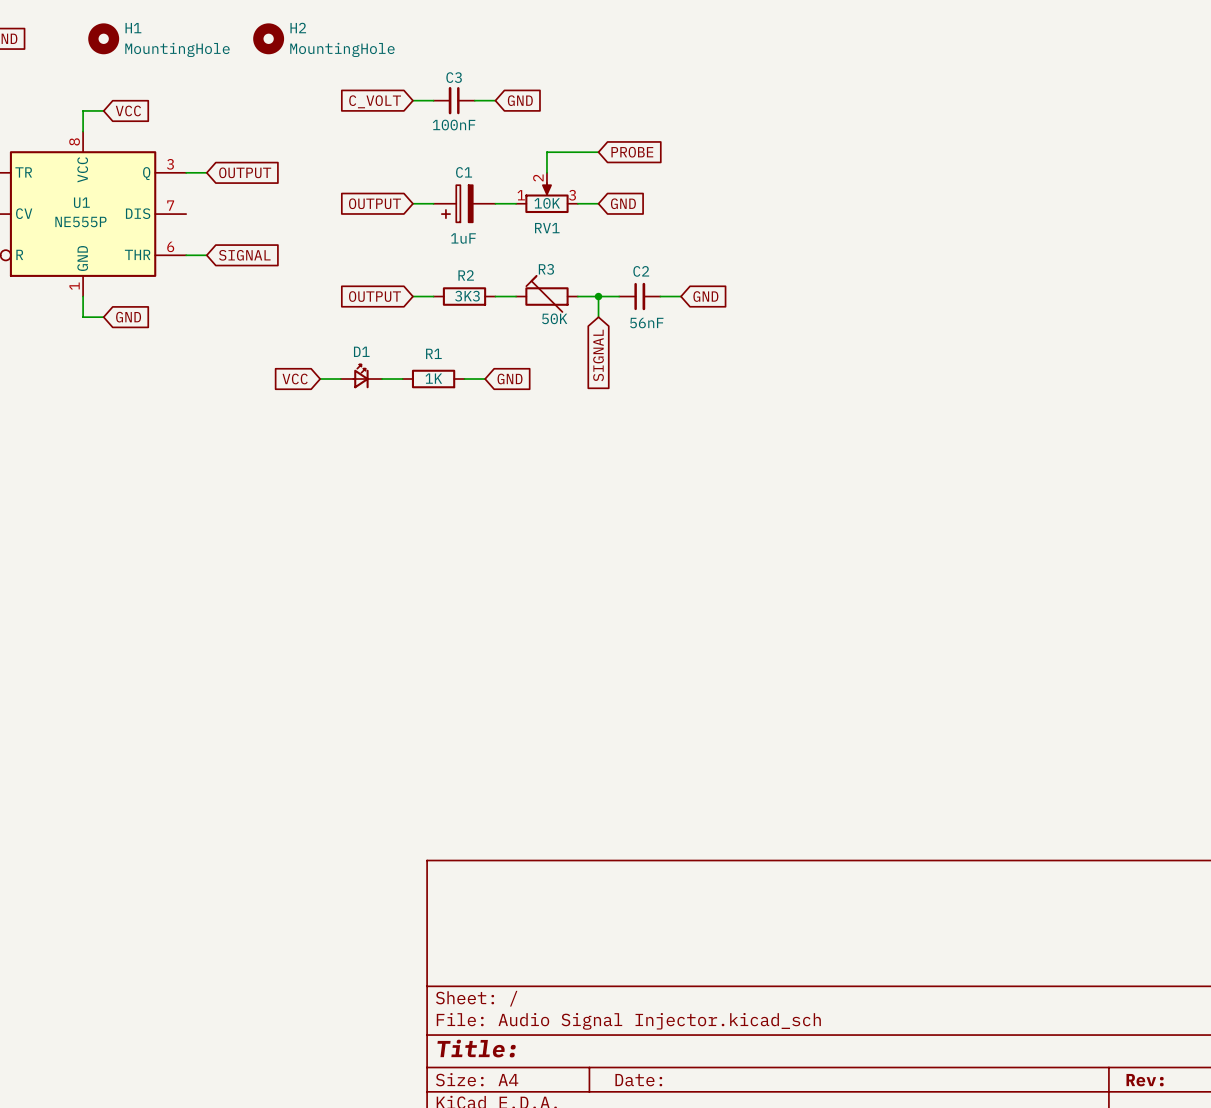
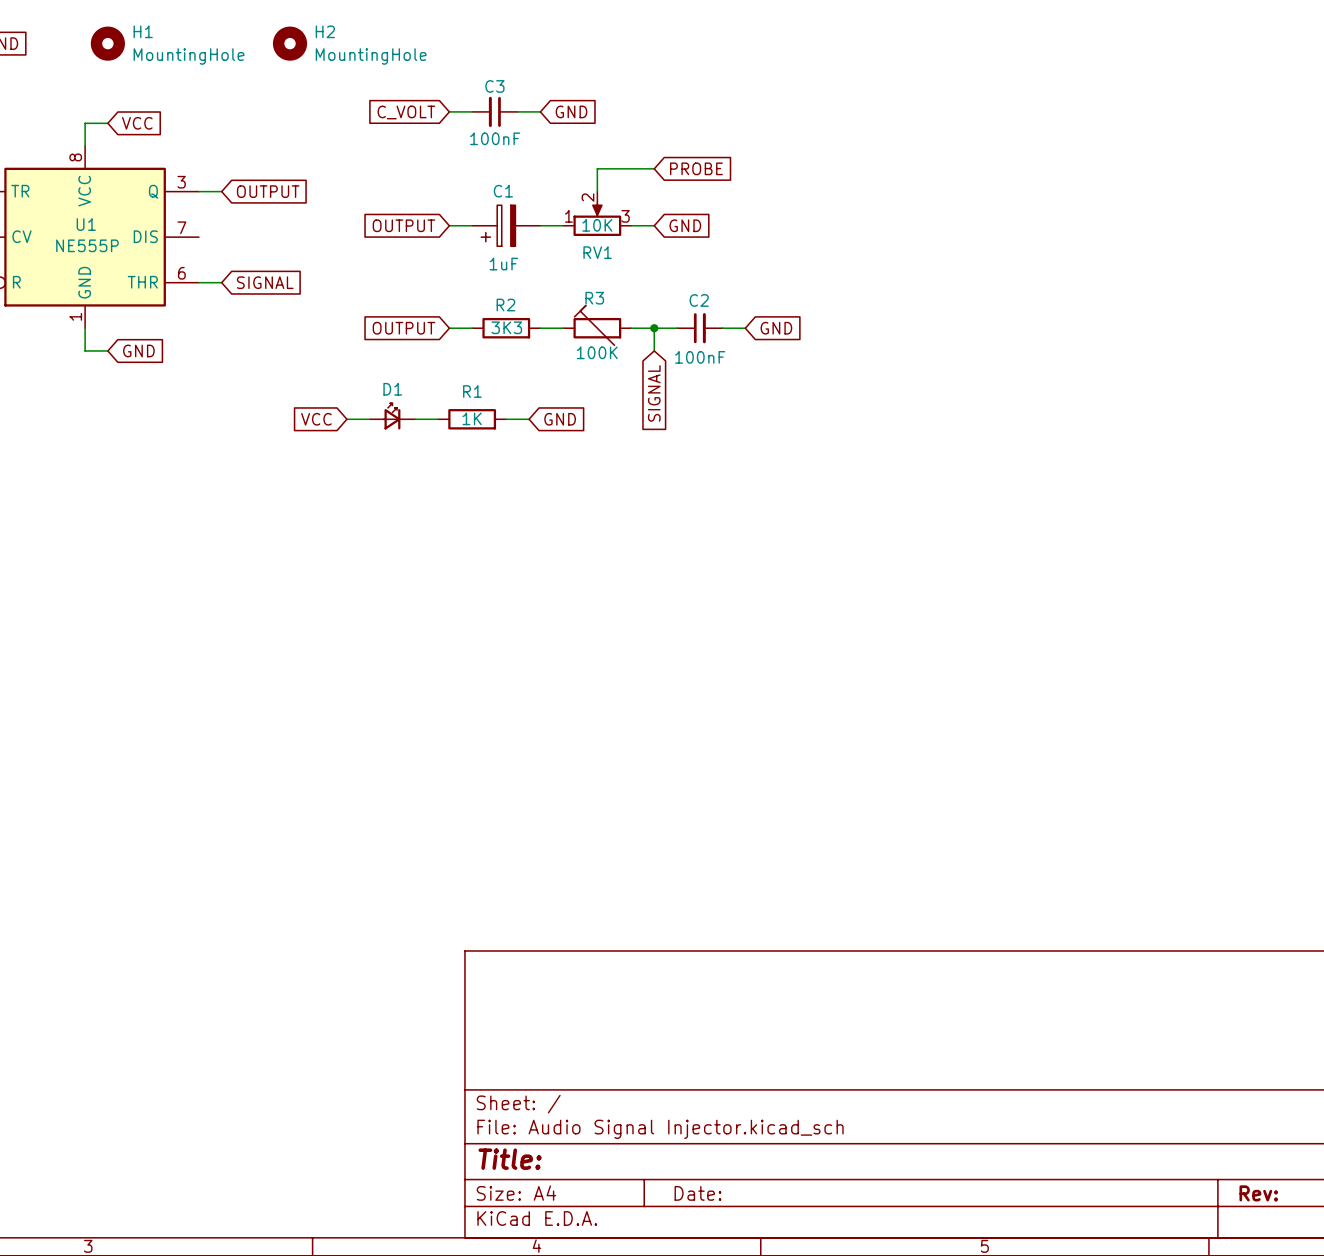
R3 value: 50K (554, 318) -> 100K (597, 352)
C2 value: 56nF (646, 323) -> 100nF (700, 357)

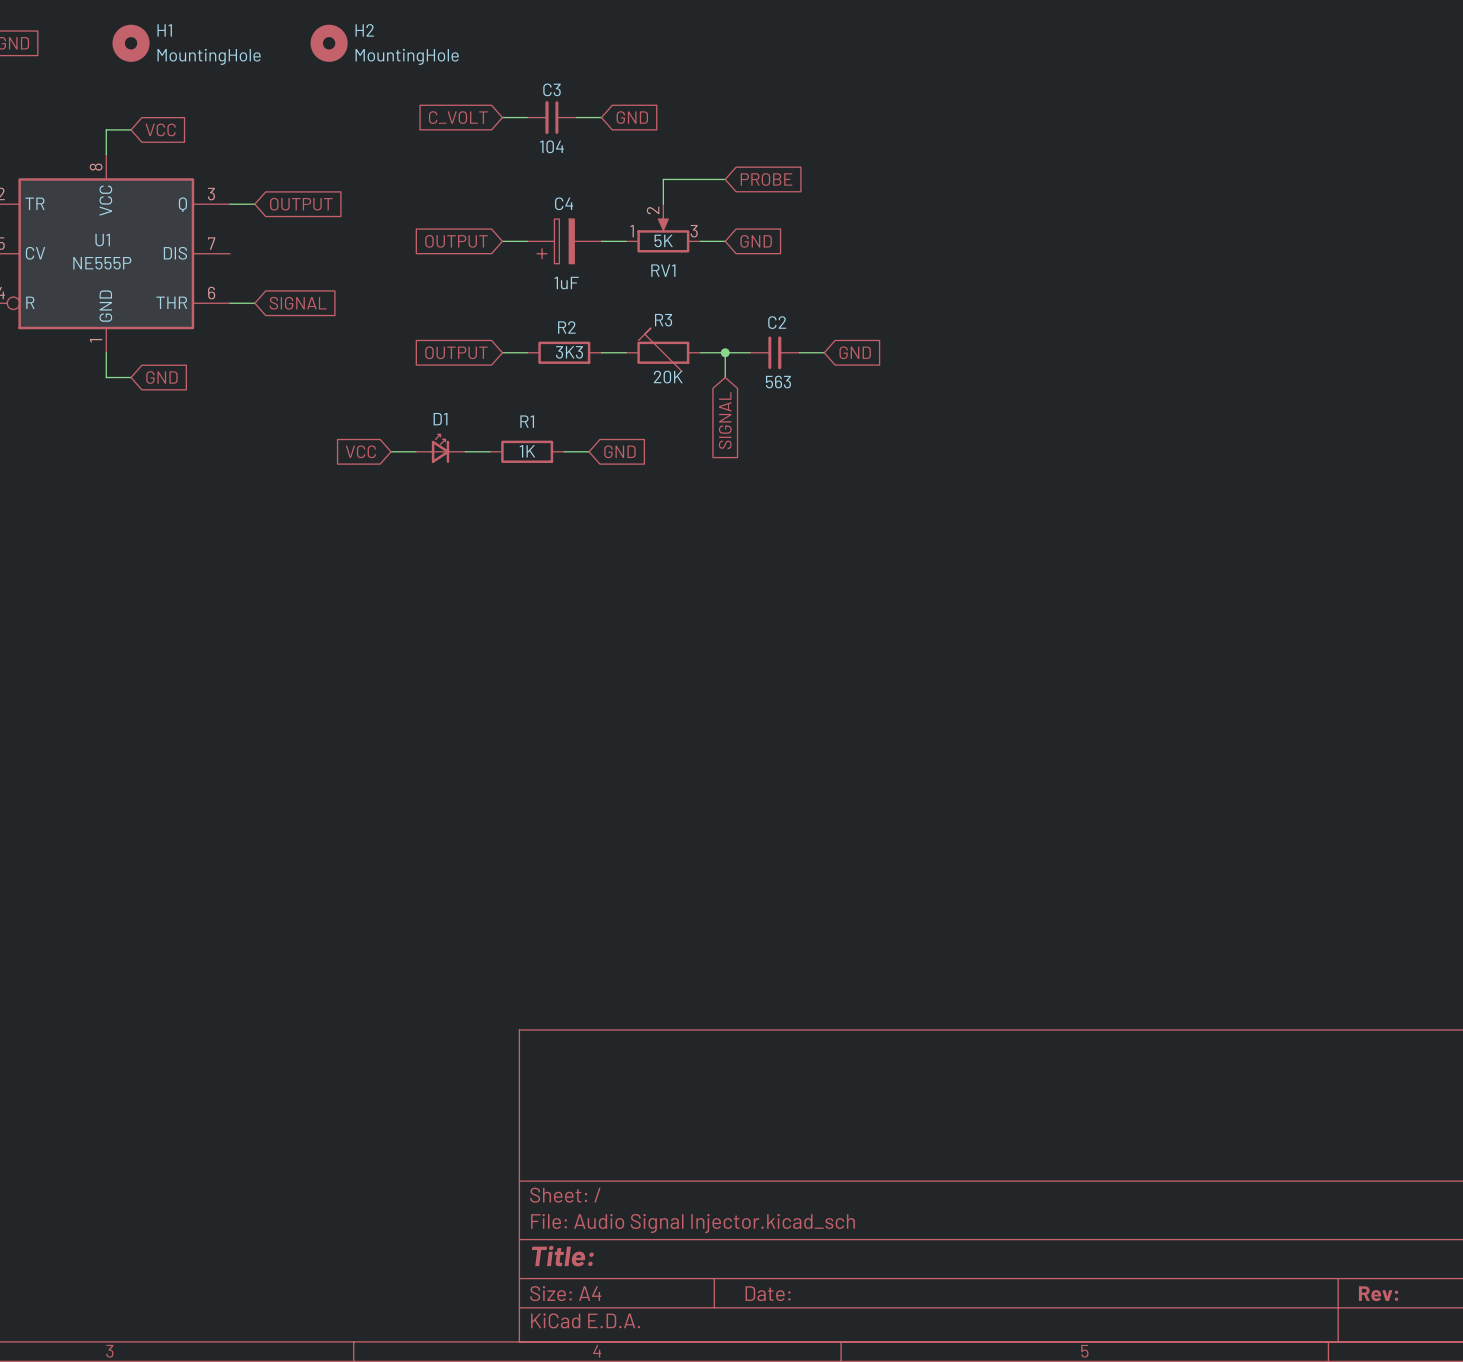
C3 value: 100nF (495, 138) -> 104 (551, 146)
C1 name: C1 (503, 191) -> C4 (564, 203)
RV1 value: 10K (597, 225) -> 5K (663, 240)
R3 value: 100K (597, 352) -> 20K (668, 377)
C2 value: 100nF (700, 357) -> 563 (778, 382)

